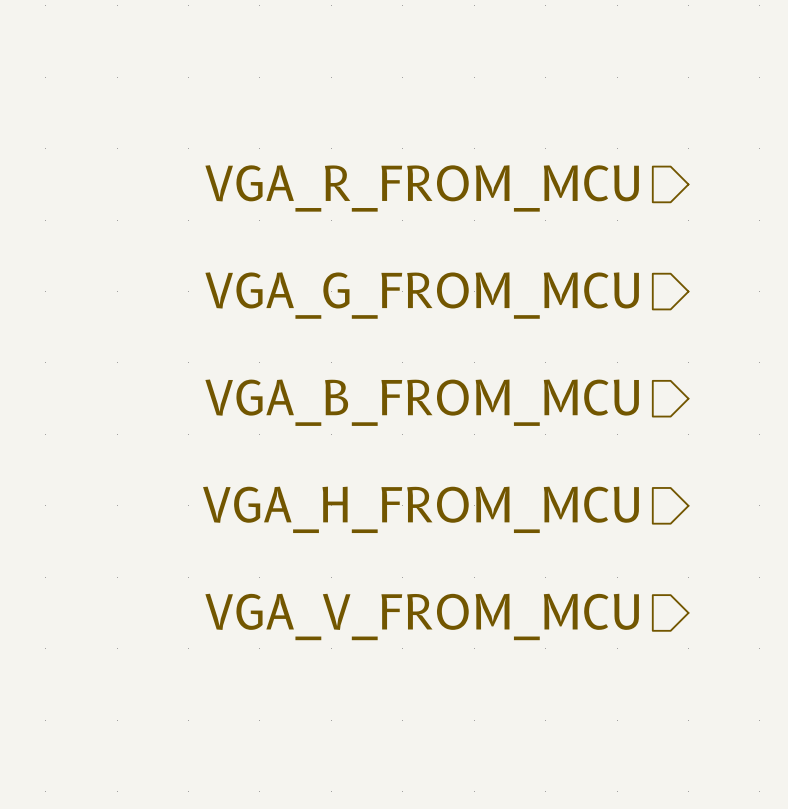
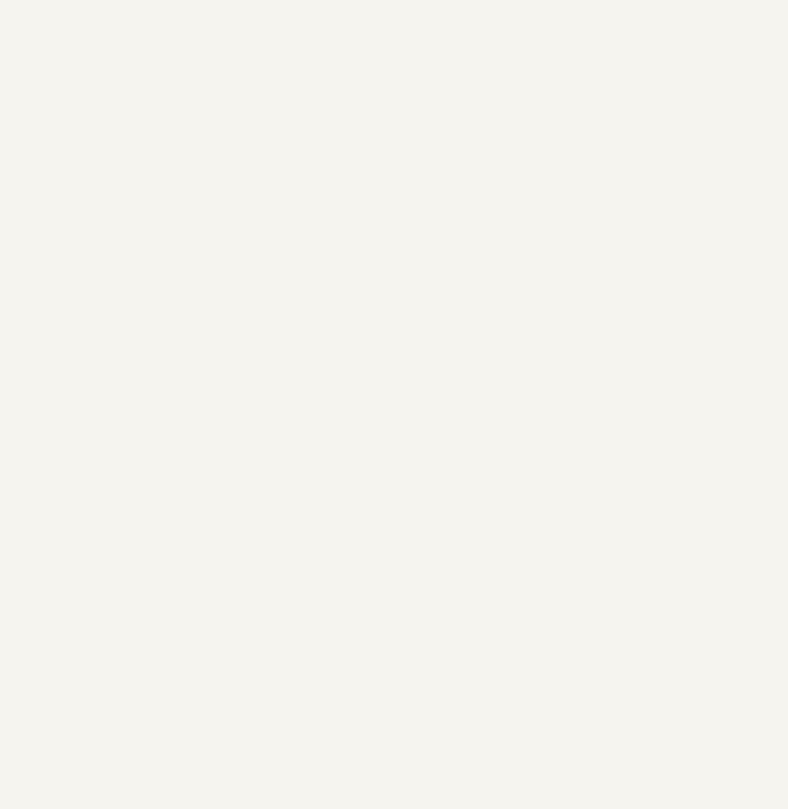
hierarchical label: VGA_R_FROM_MCU (422, 188) -> none
hierarchical label: VGA_G_FROM_MCU (422, 295) -> none
hierarchical label: VGA_B_FROM_MCU (422, 402) -> none
hierarchical label: VGA_H_FROM_MCU (420, 509) -> none
hierarchical label: VGA_V_FROM_MCU (422, 616) -> none

